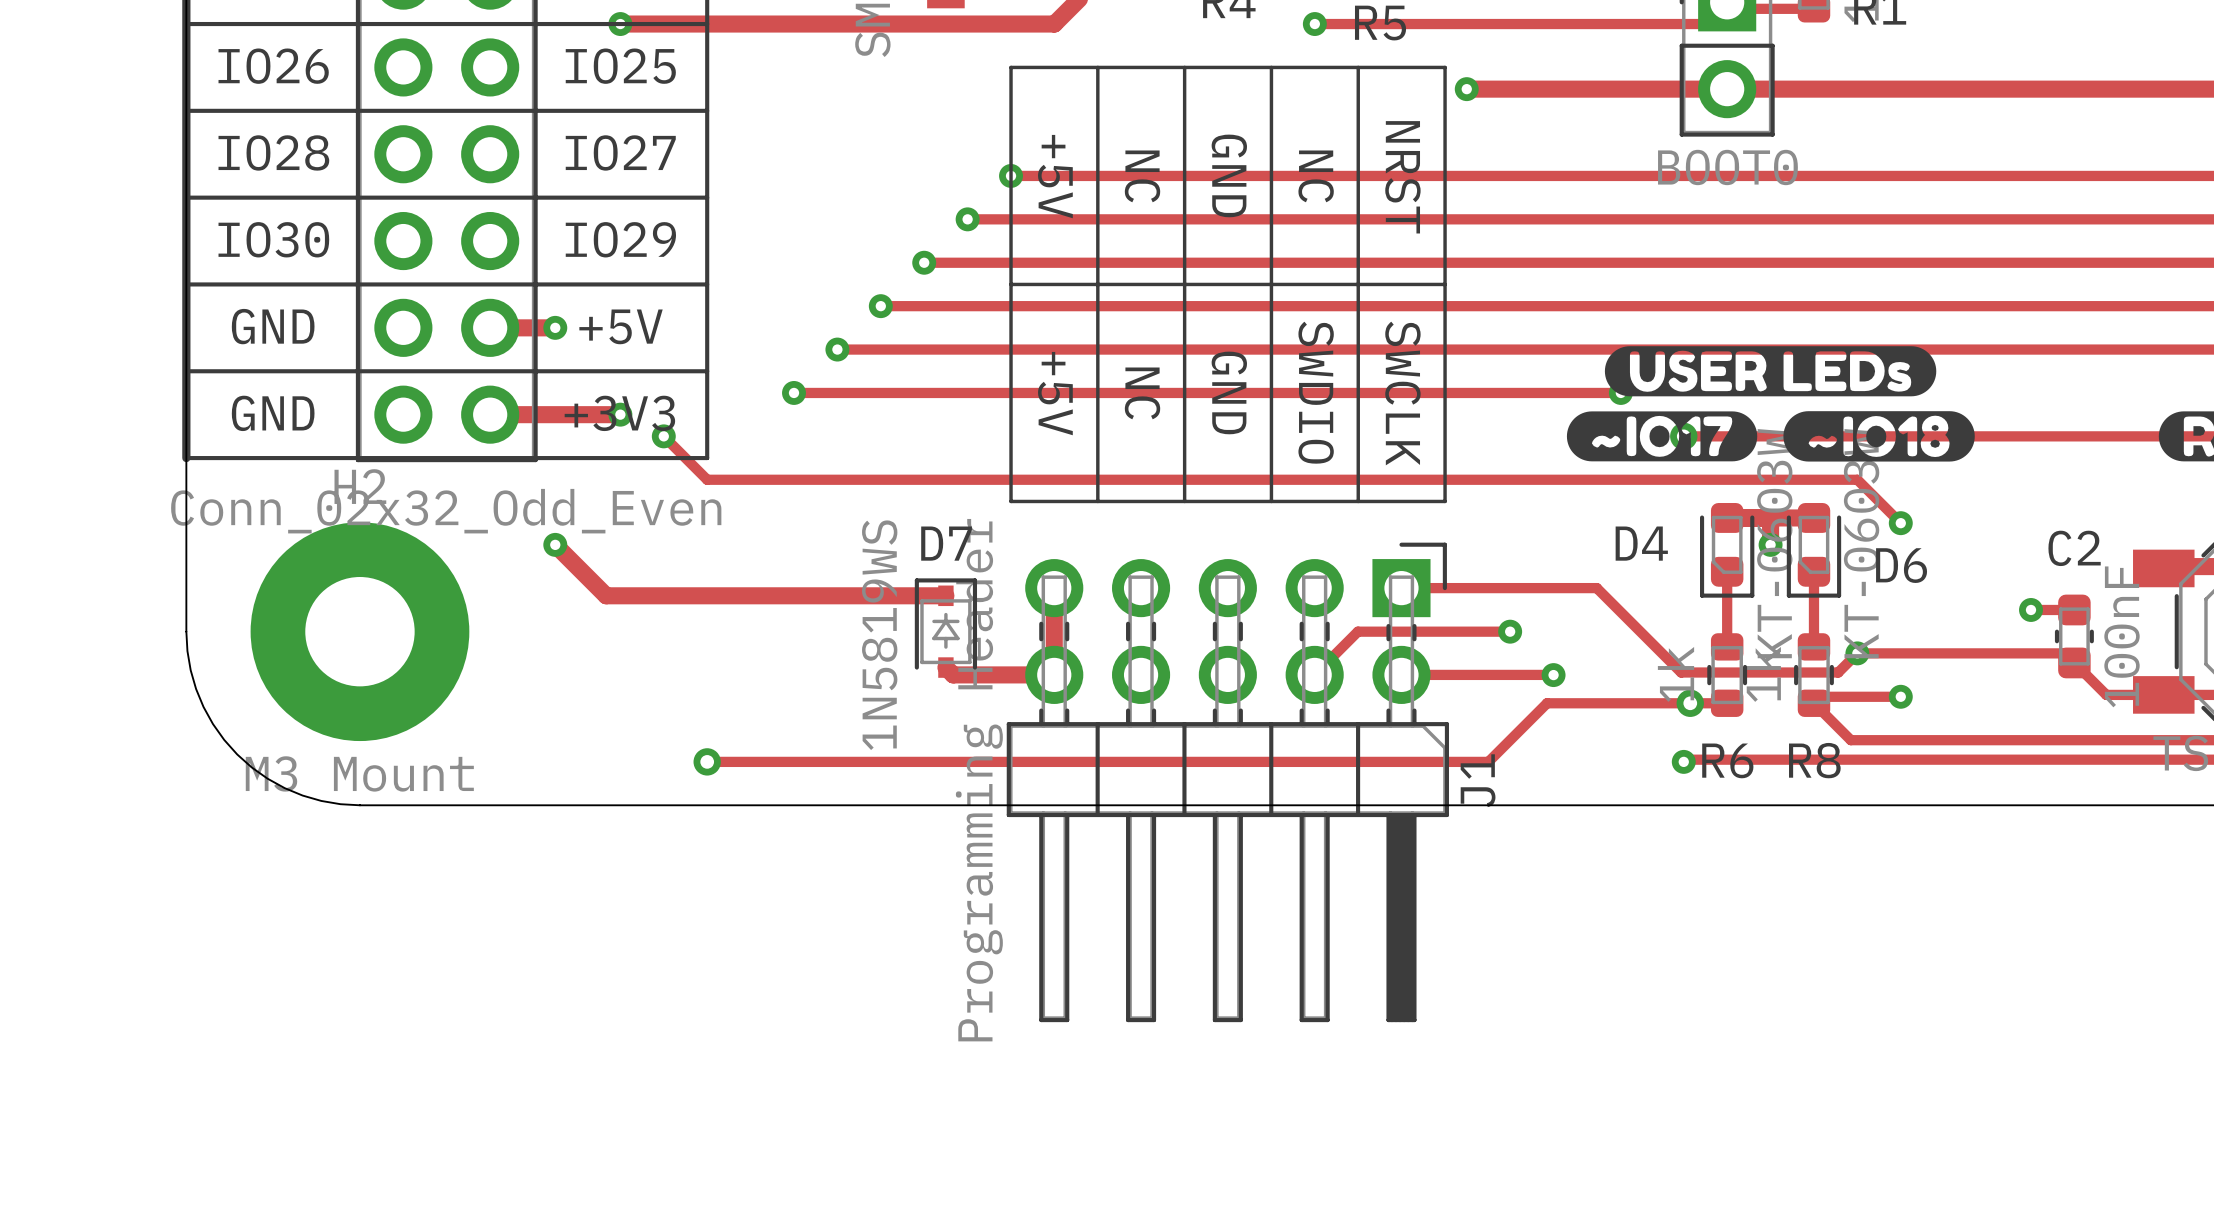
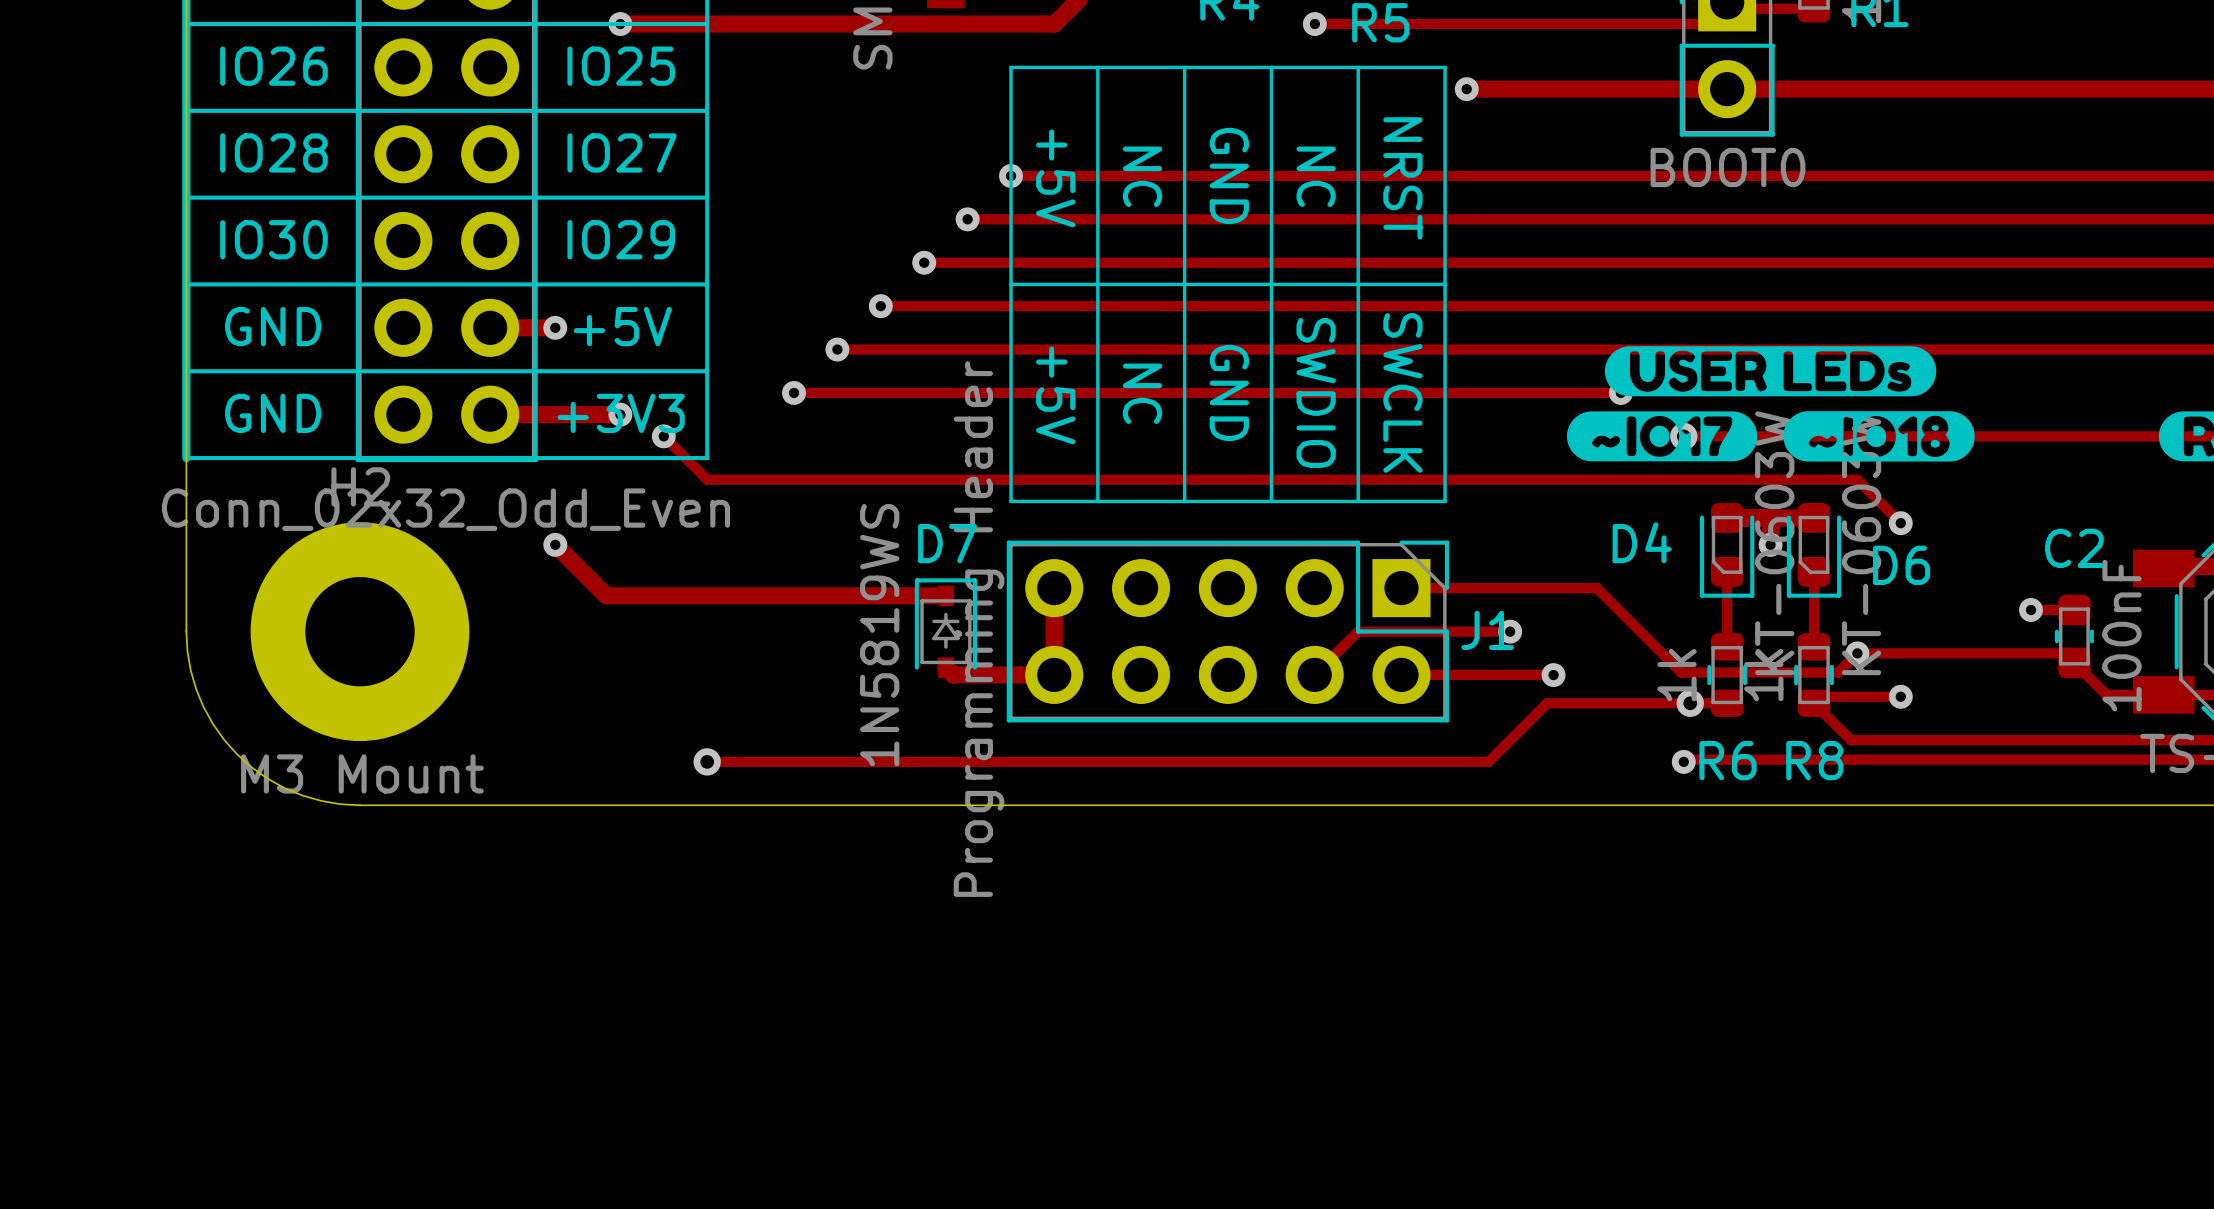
J1 footprint: [1006, 542, 1449, 1023] -> [1006, 540, 1449, 723]

